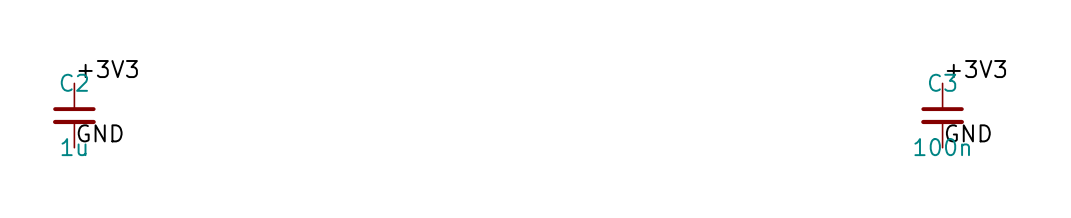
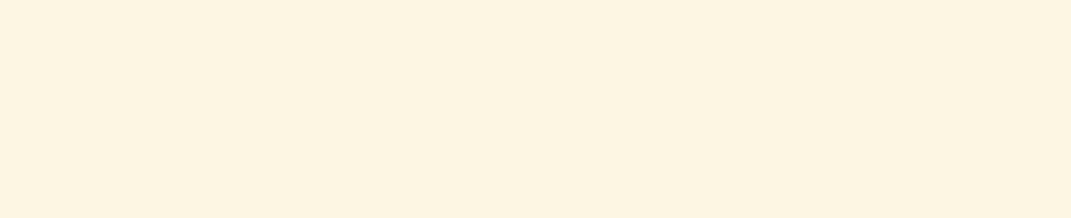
label: +3V3 (108, 69) -> none
label: +3V3 (976, 69) -> none
C2: 1u (74, 115) -> none
C3: 100n (942, 115) -> none
label: GND (100, 133) -> none
label: GND (968, 133) -> none

